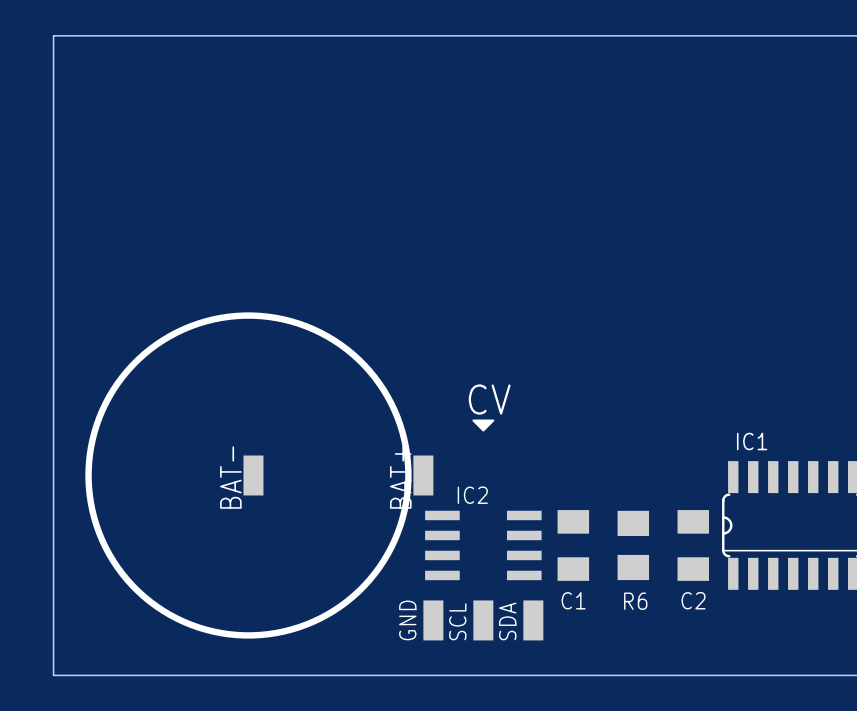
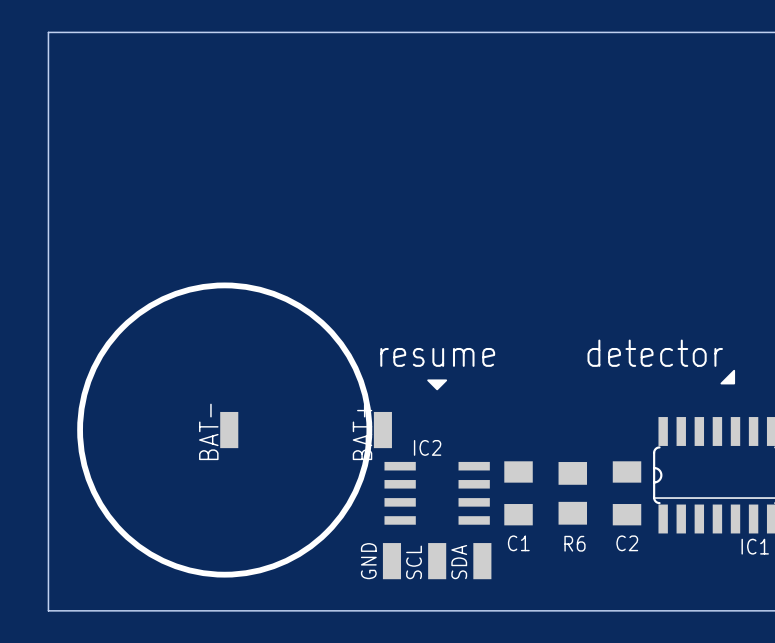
text: none -> detector (655, 353)
text: none -> resume (437, 357)
text: CV (489, 399) -> none
drawing: none -> [720, 369, 736, 385]
IC1 name position: IC1 (752, 441) -> IC1 (755, 546)

